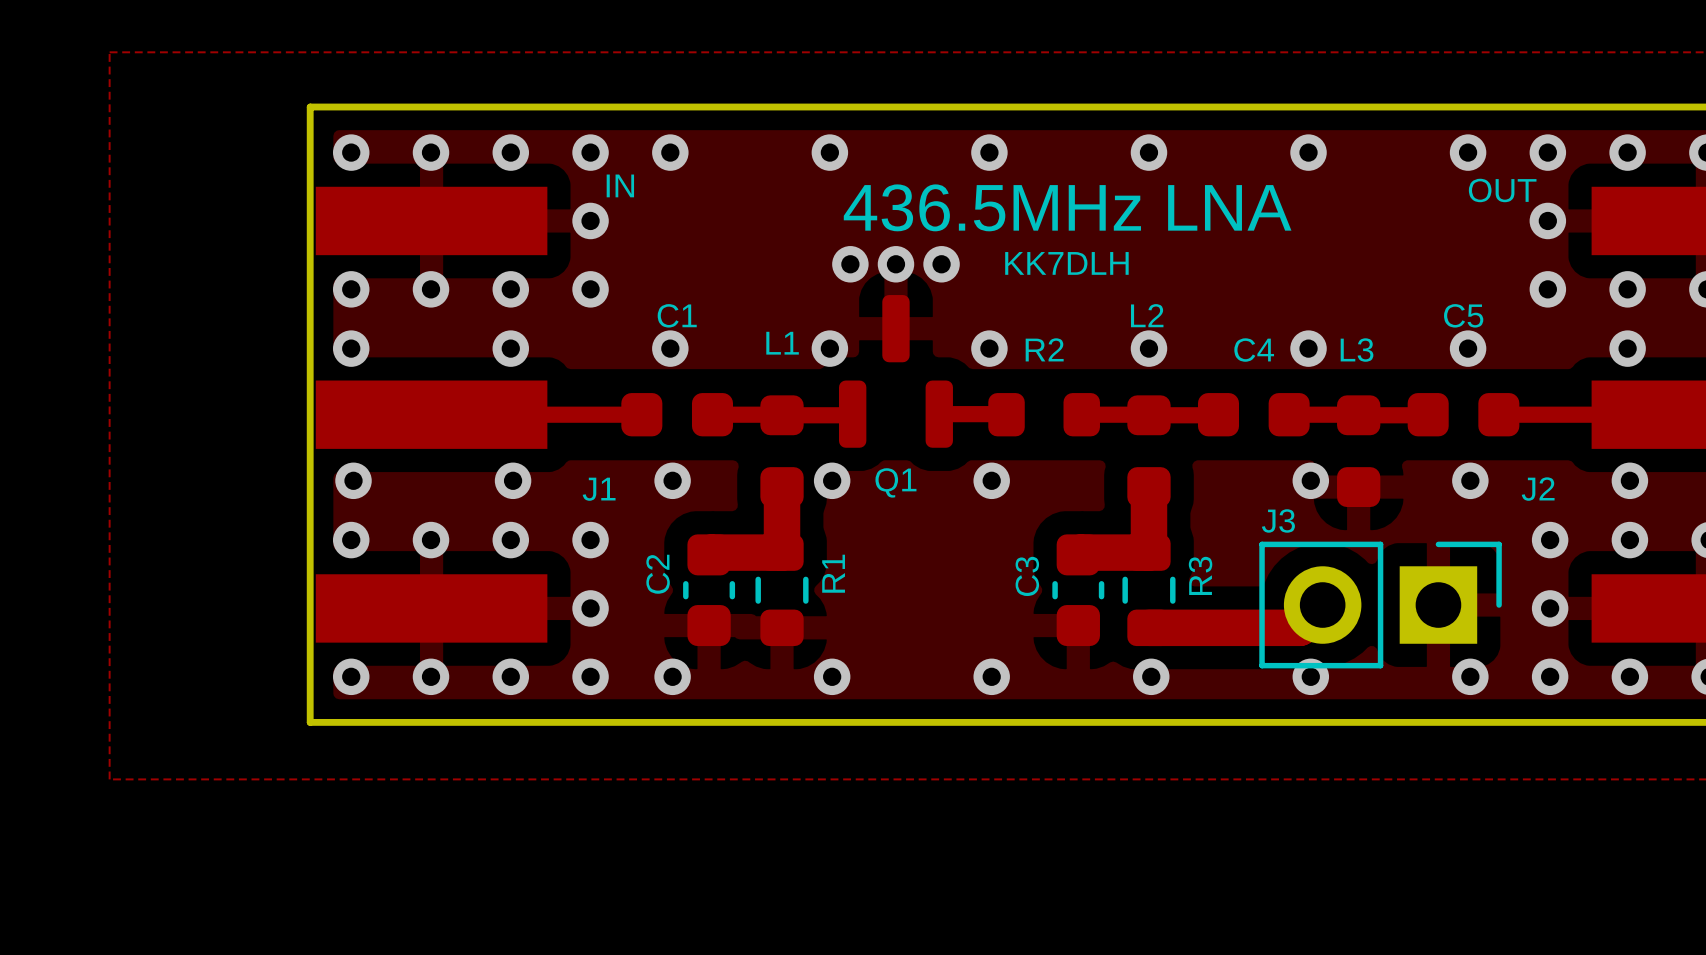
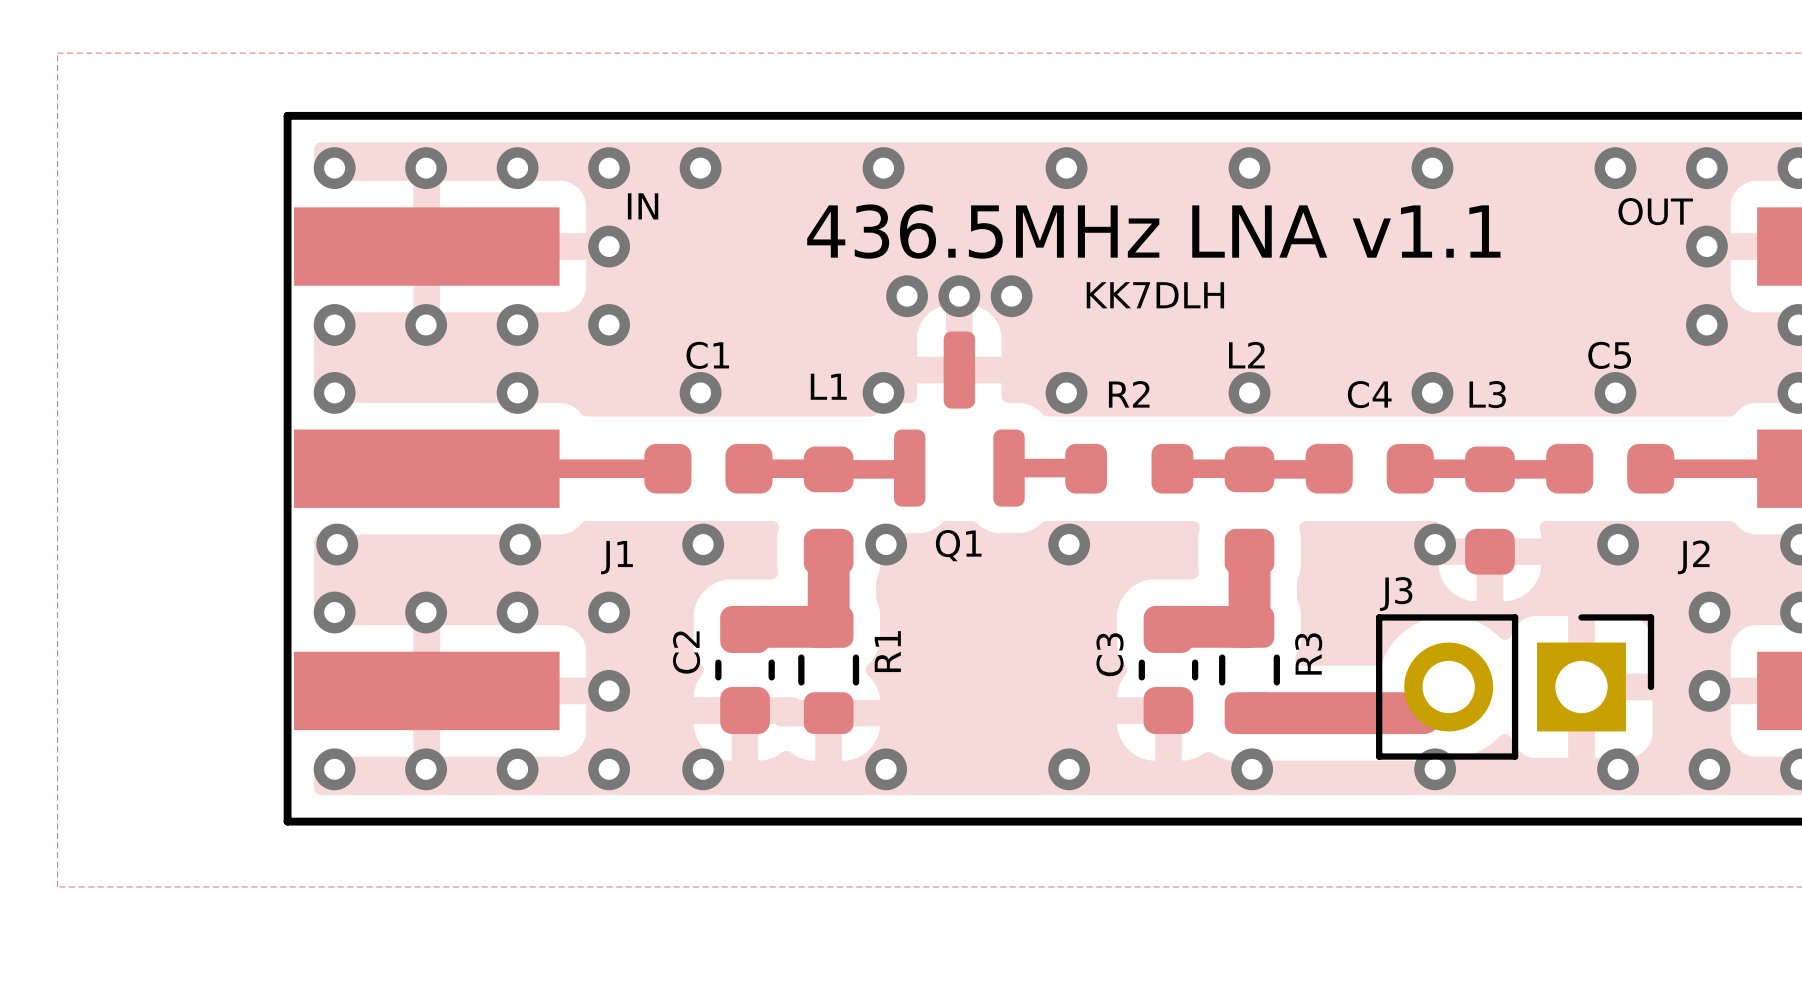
text: 436.5MHz LNA (1067, 207) -> 436.5MHz LNA v1.1 (1153, 231)

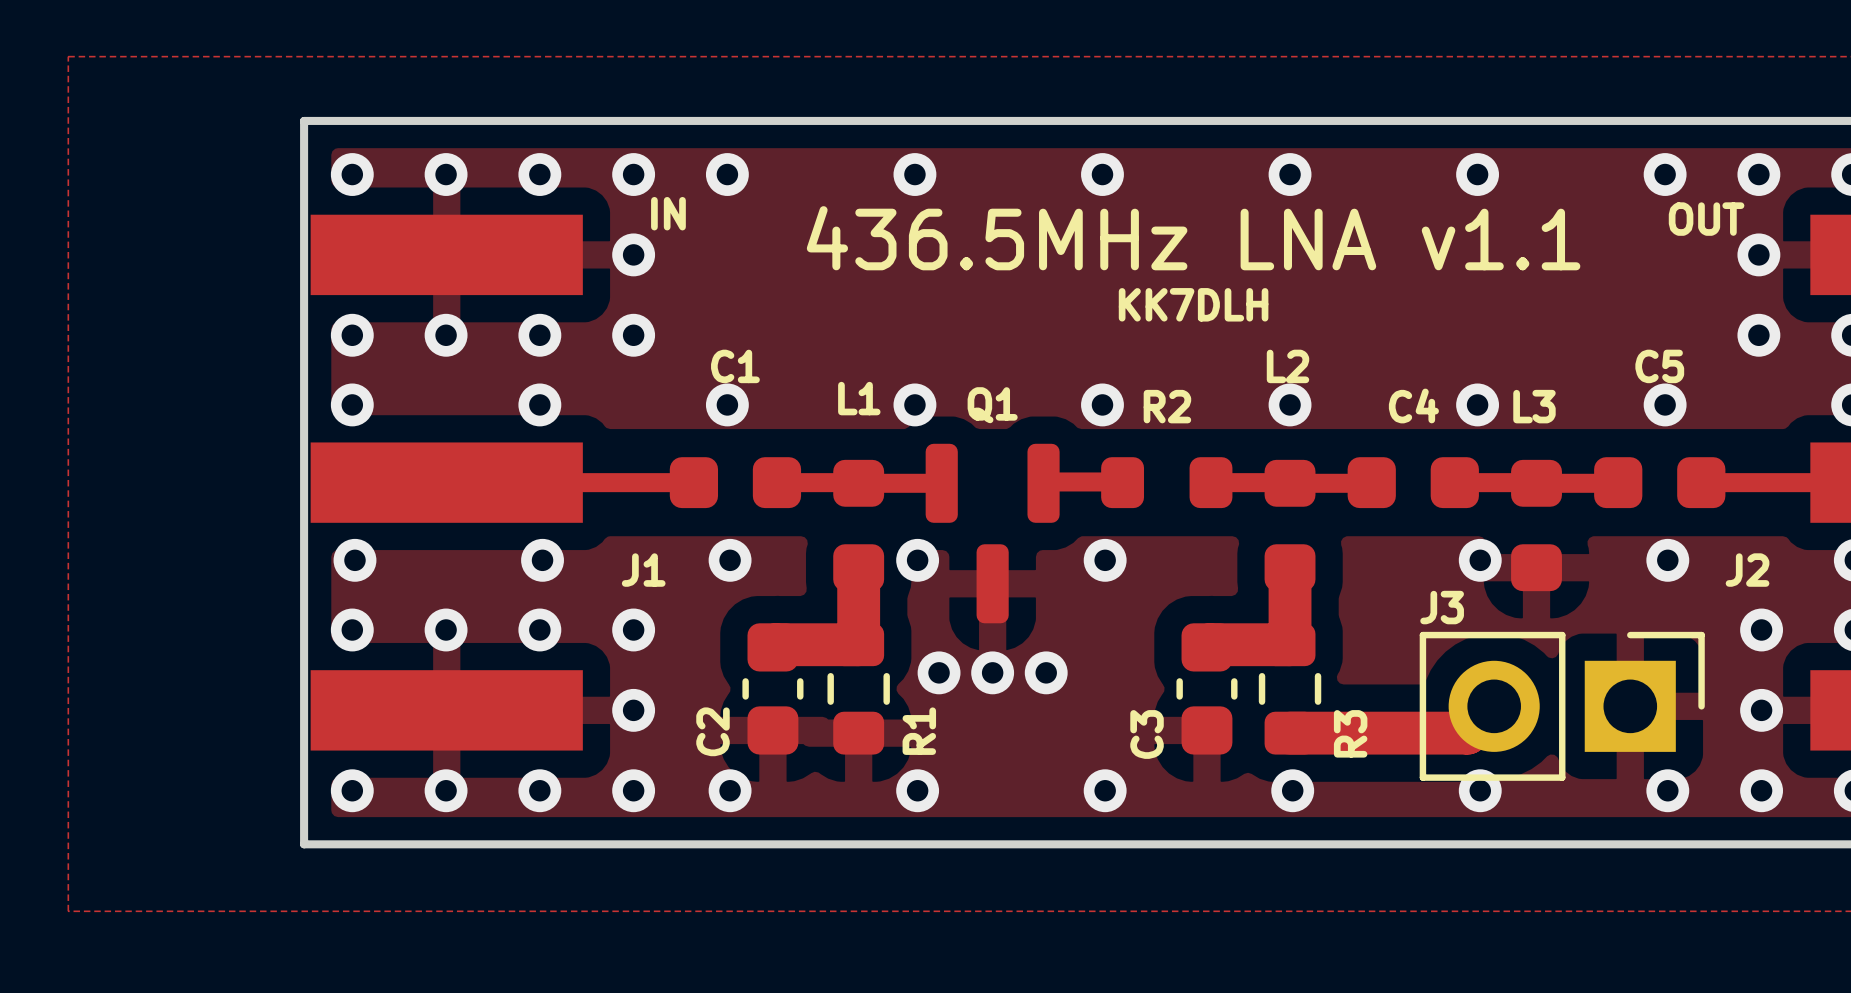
via: (907, 296) -> none
via: (959, 296) -> none
via: (1011, 296) -> none
Q1 rotation: 0° (959, 419) -> 180° (992, 533)
R1 name position: R1 (887, 651) -> R1 (919, 731)
C2 name position: C2 (686, 652) -> C2 (713, 731)
via: none -> (939, 672)
via: none -> (992, 672)
via: none -> (1046, 672)
C3 name position: C3 (1110, 654) -> C3 (1147, 734)
R3 name position: R3 (1308, 654) -> R3 (1350, 733)

